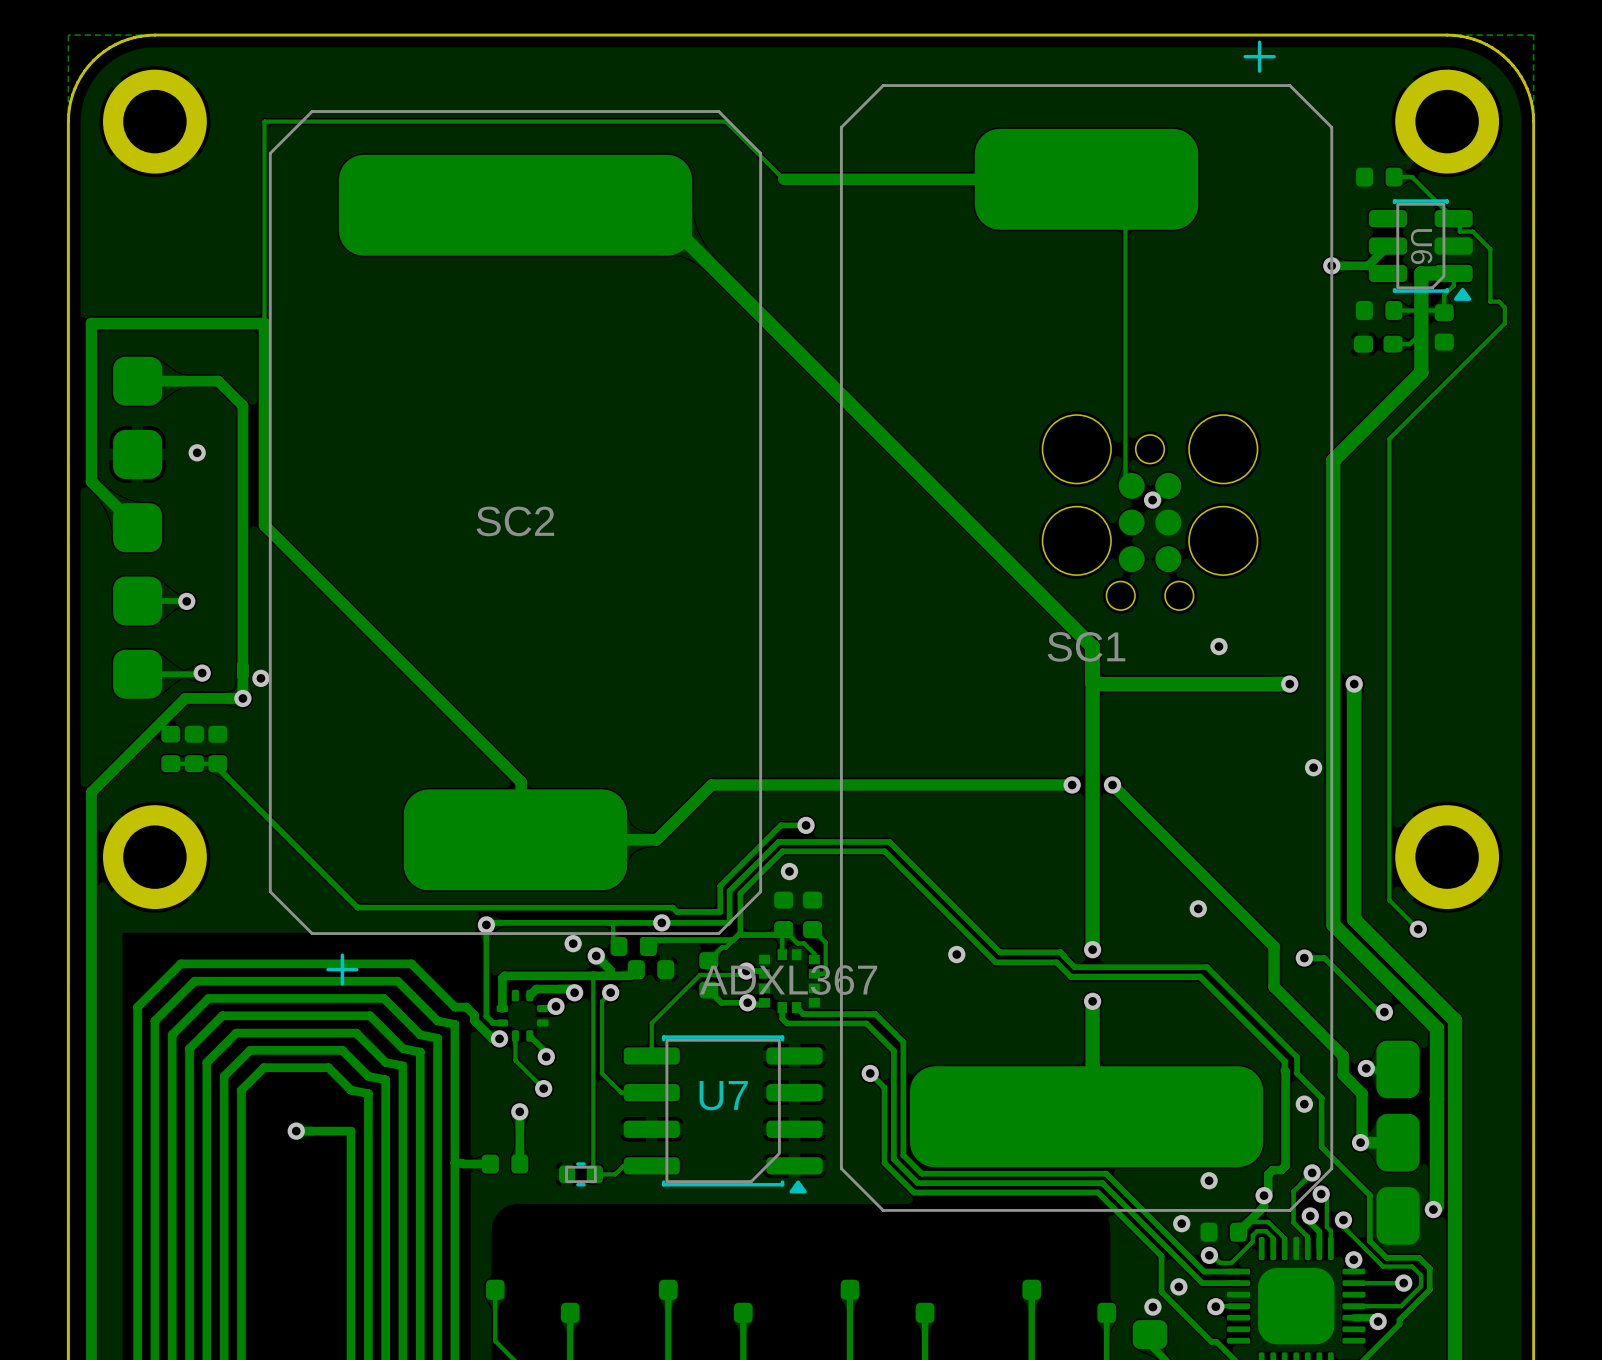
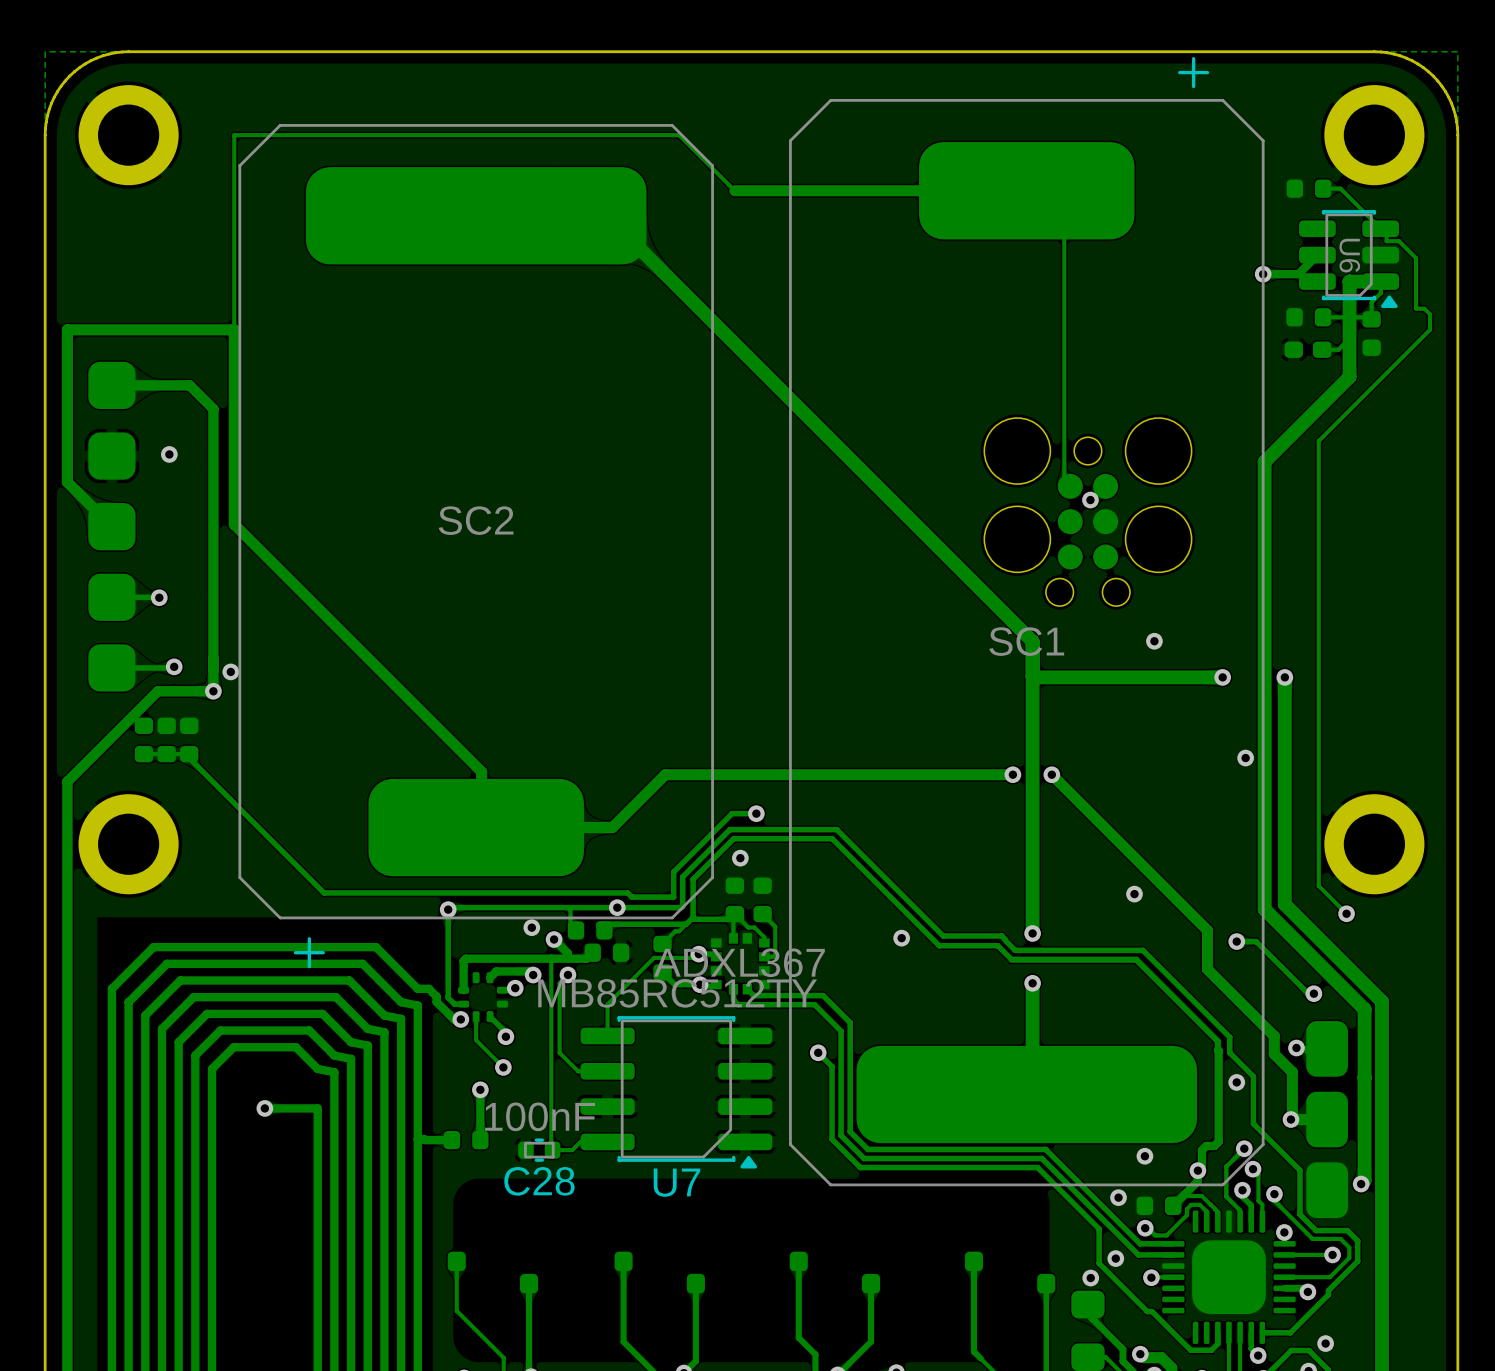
U7 value: none -> MB85RC512TY (677, 993)
U7 name position: U7 (723, 1095) -> U7 (676, 1182)
C28 value: none -> 100nF (540, 1116)
C28 name: none -> C28 (539, 1181)

